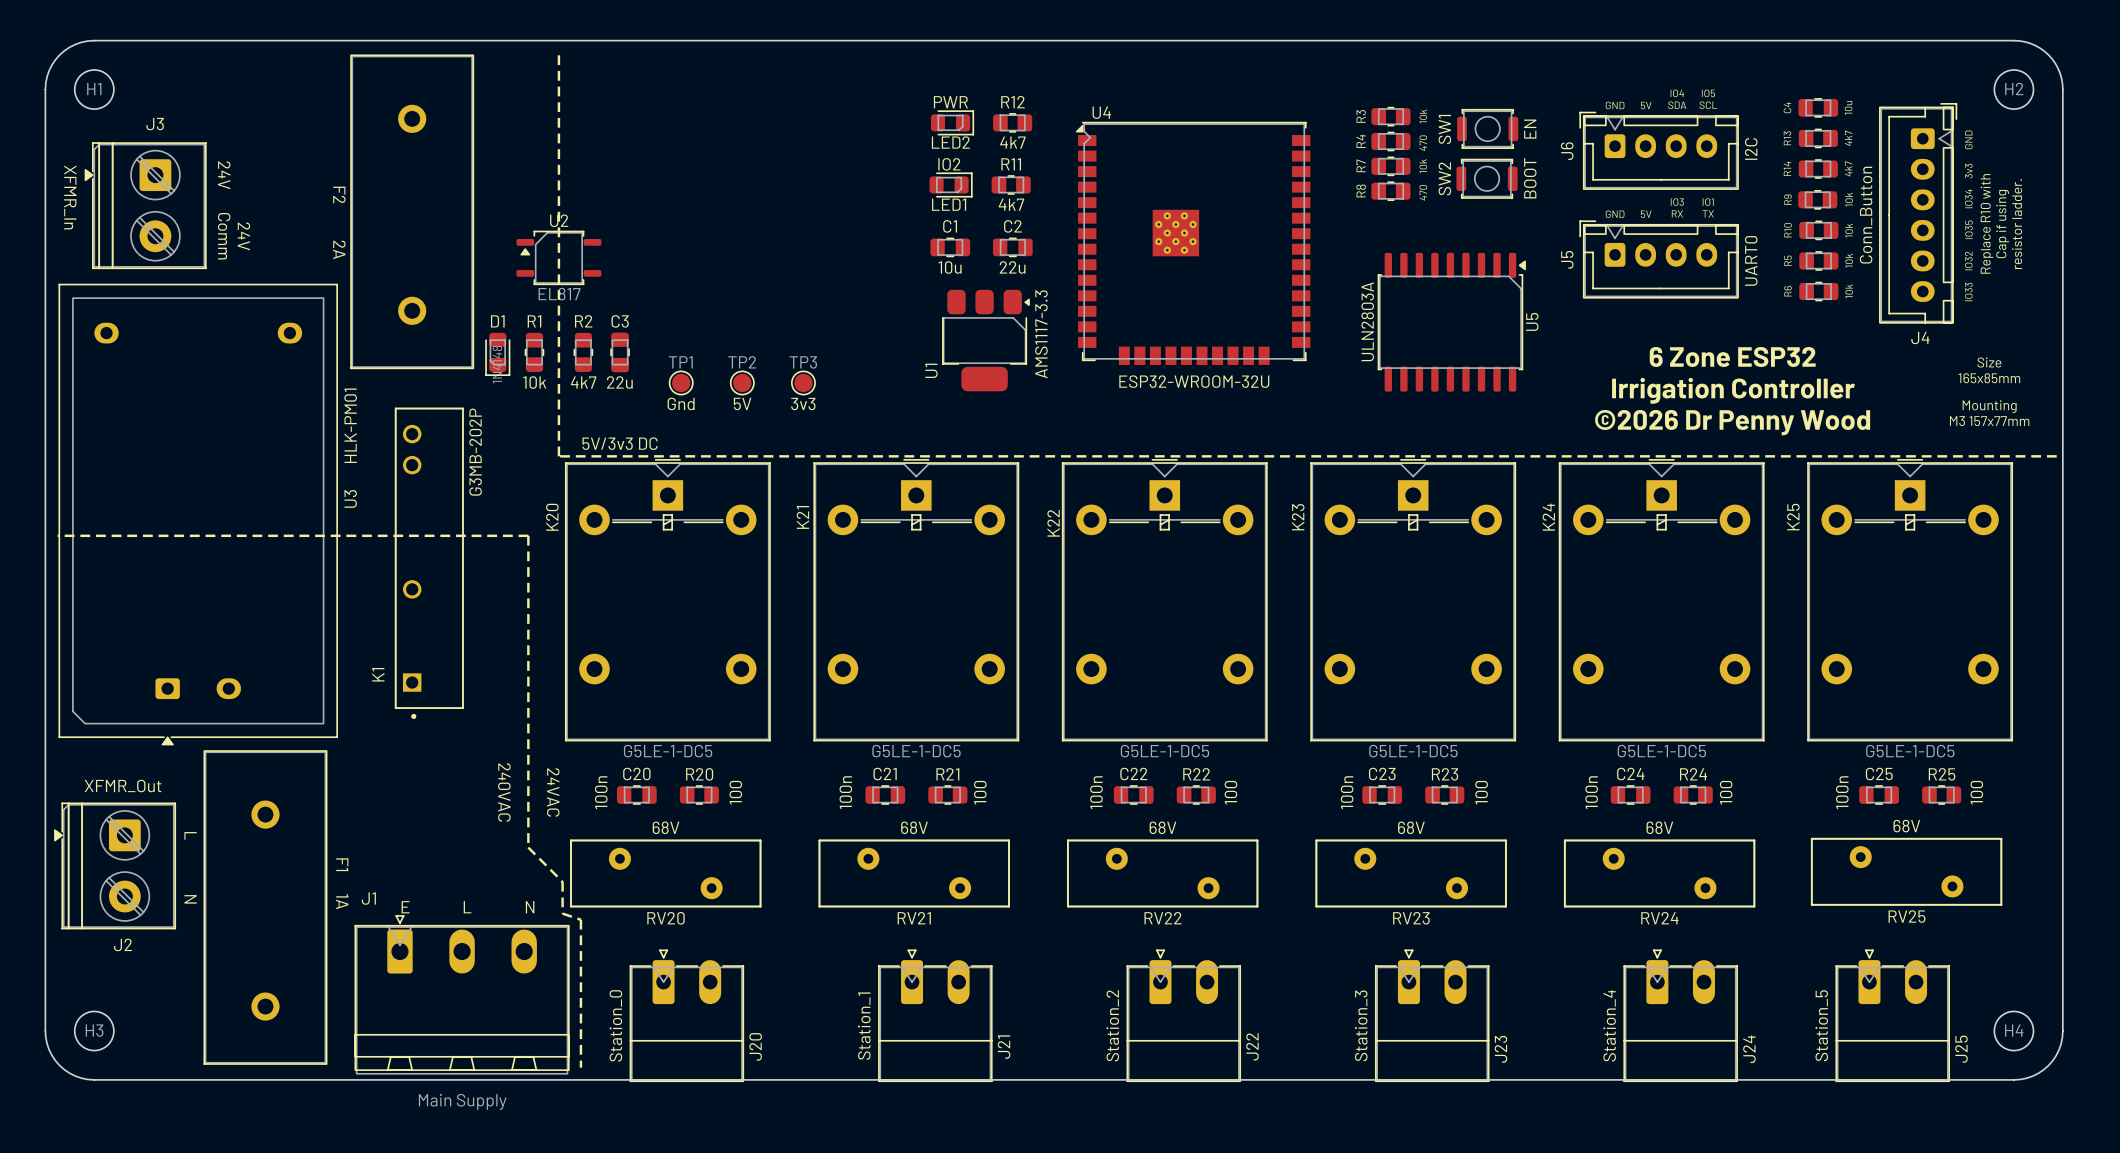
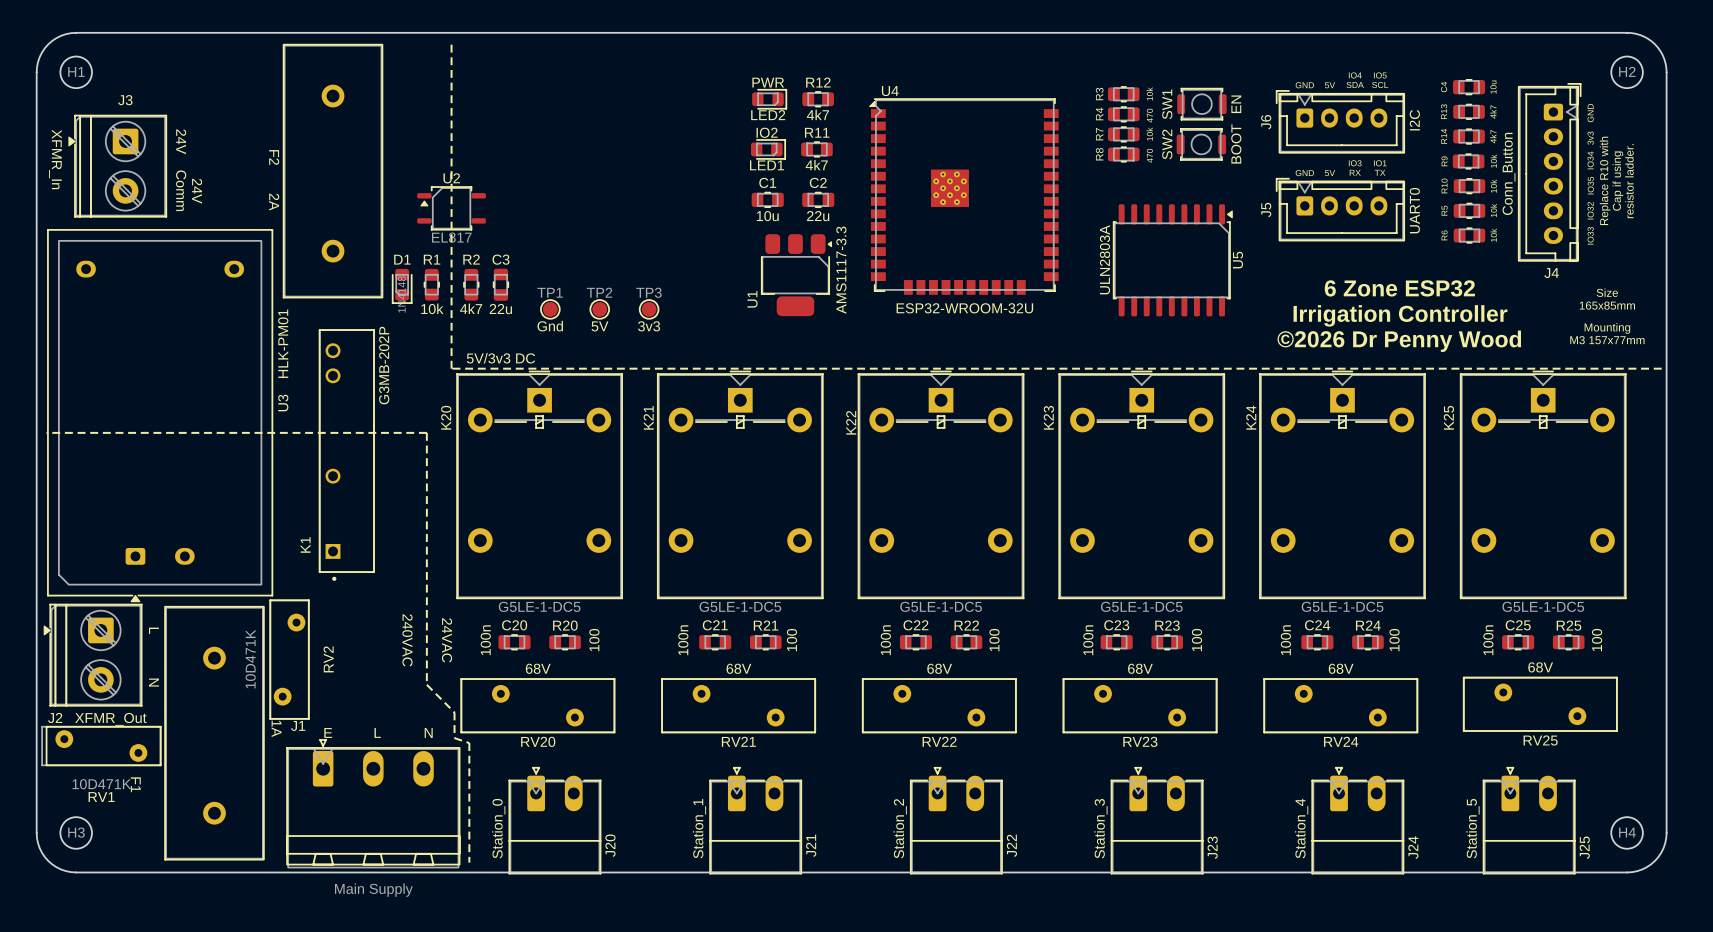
text: none -> L (153, 630)
J2 value position: XFMR_Out (123, 786) -> XFMR_Out (110, 719)
RV2: none -> 10D471K (289, 659)
text: L (190, 835) -> N (153, 682)
F1 name position: F1 (342, 864) -> F1 (135, 784)
J2 position: (115, 865) -> (92, 655)
text: N (190, 899) -> none
RV1: none -> 10D471K (101, 746)
J2 name position: J2 (122, 944) -> J2 (55, 718)

